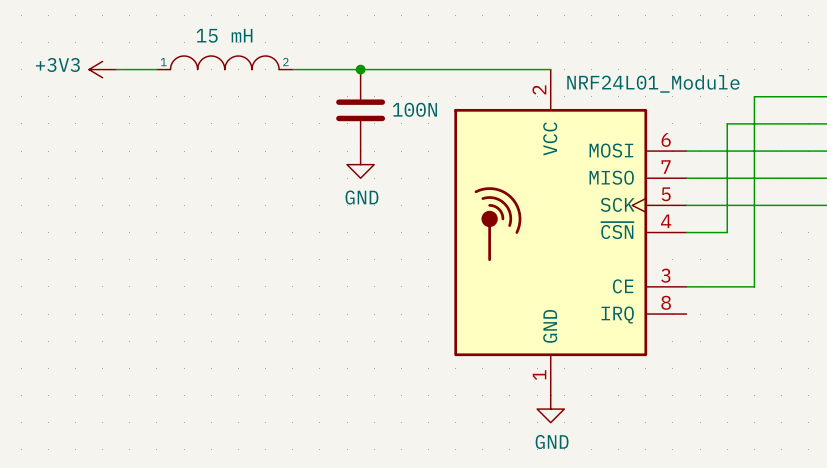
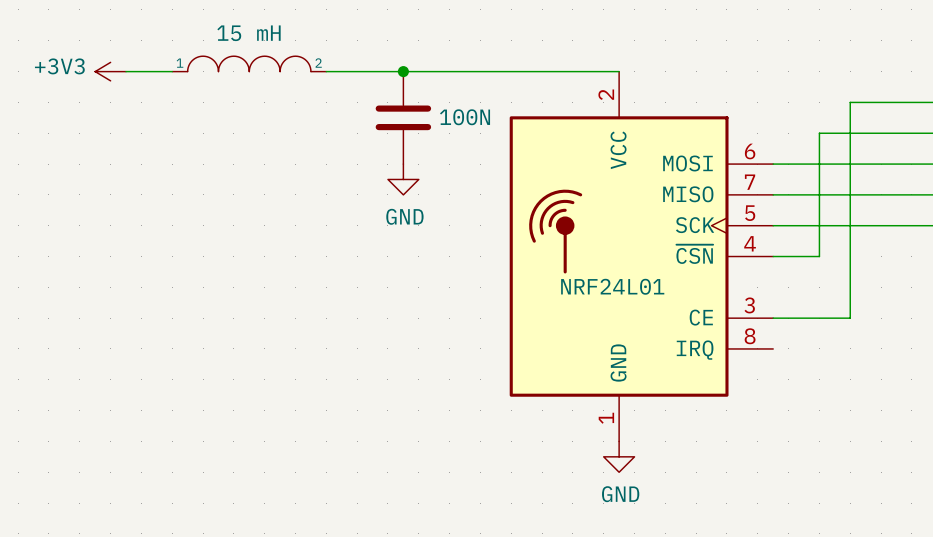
part symbol: [454, 69, 687, 396] -> [509, 71, 774, 442]
part value: NRF24L01_Module (653, 83) -> NRF24L01 (612, 286)

